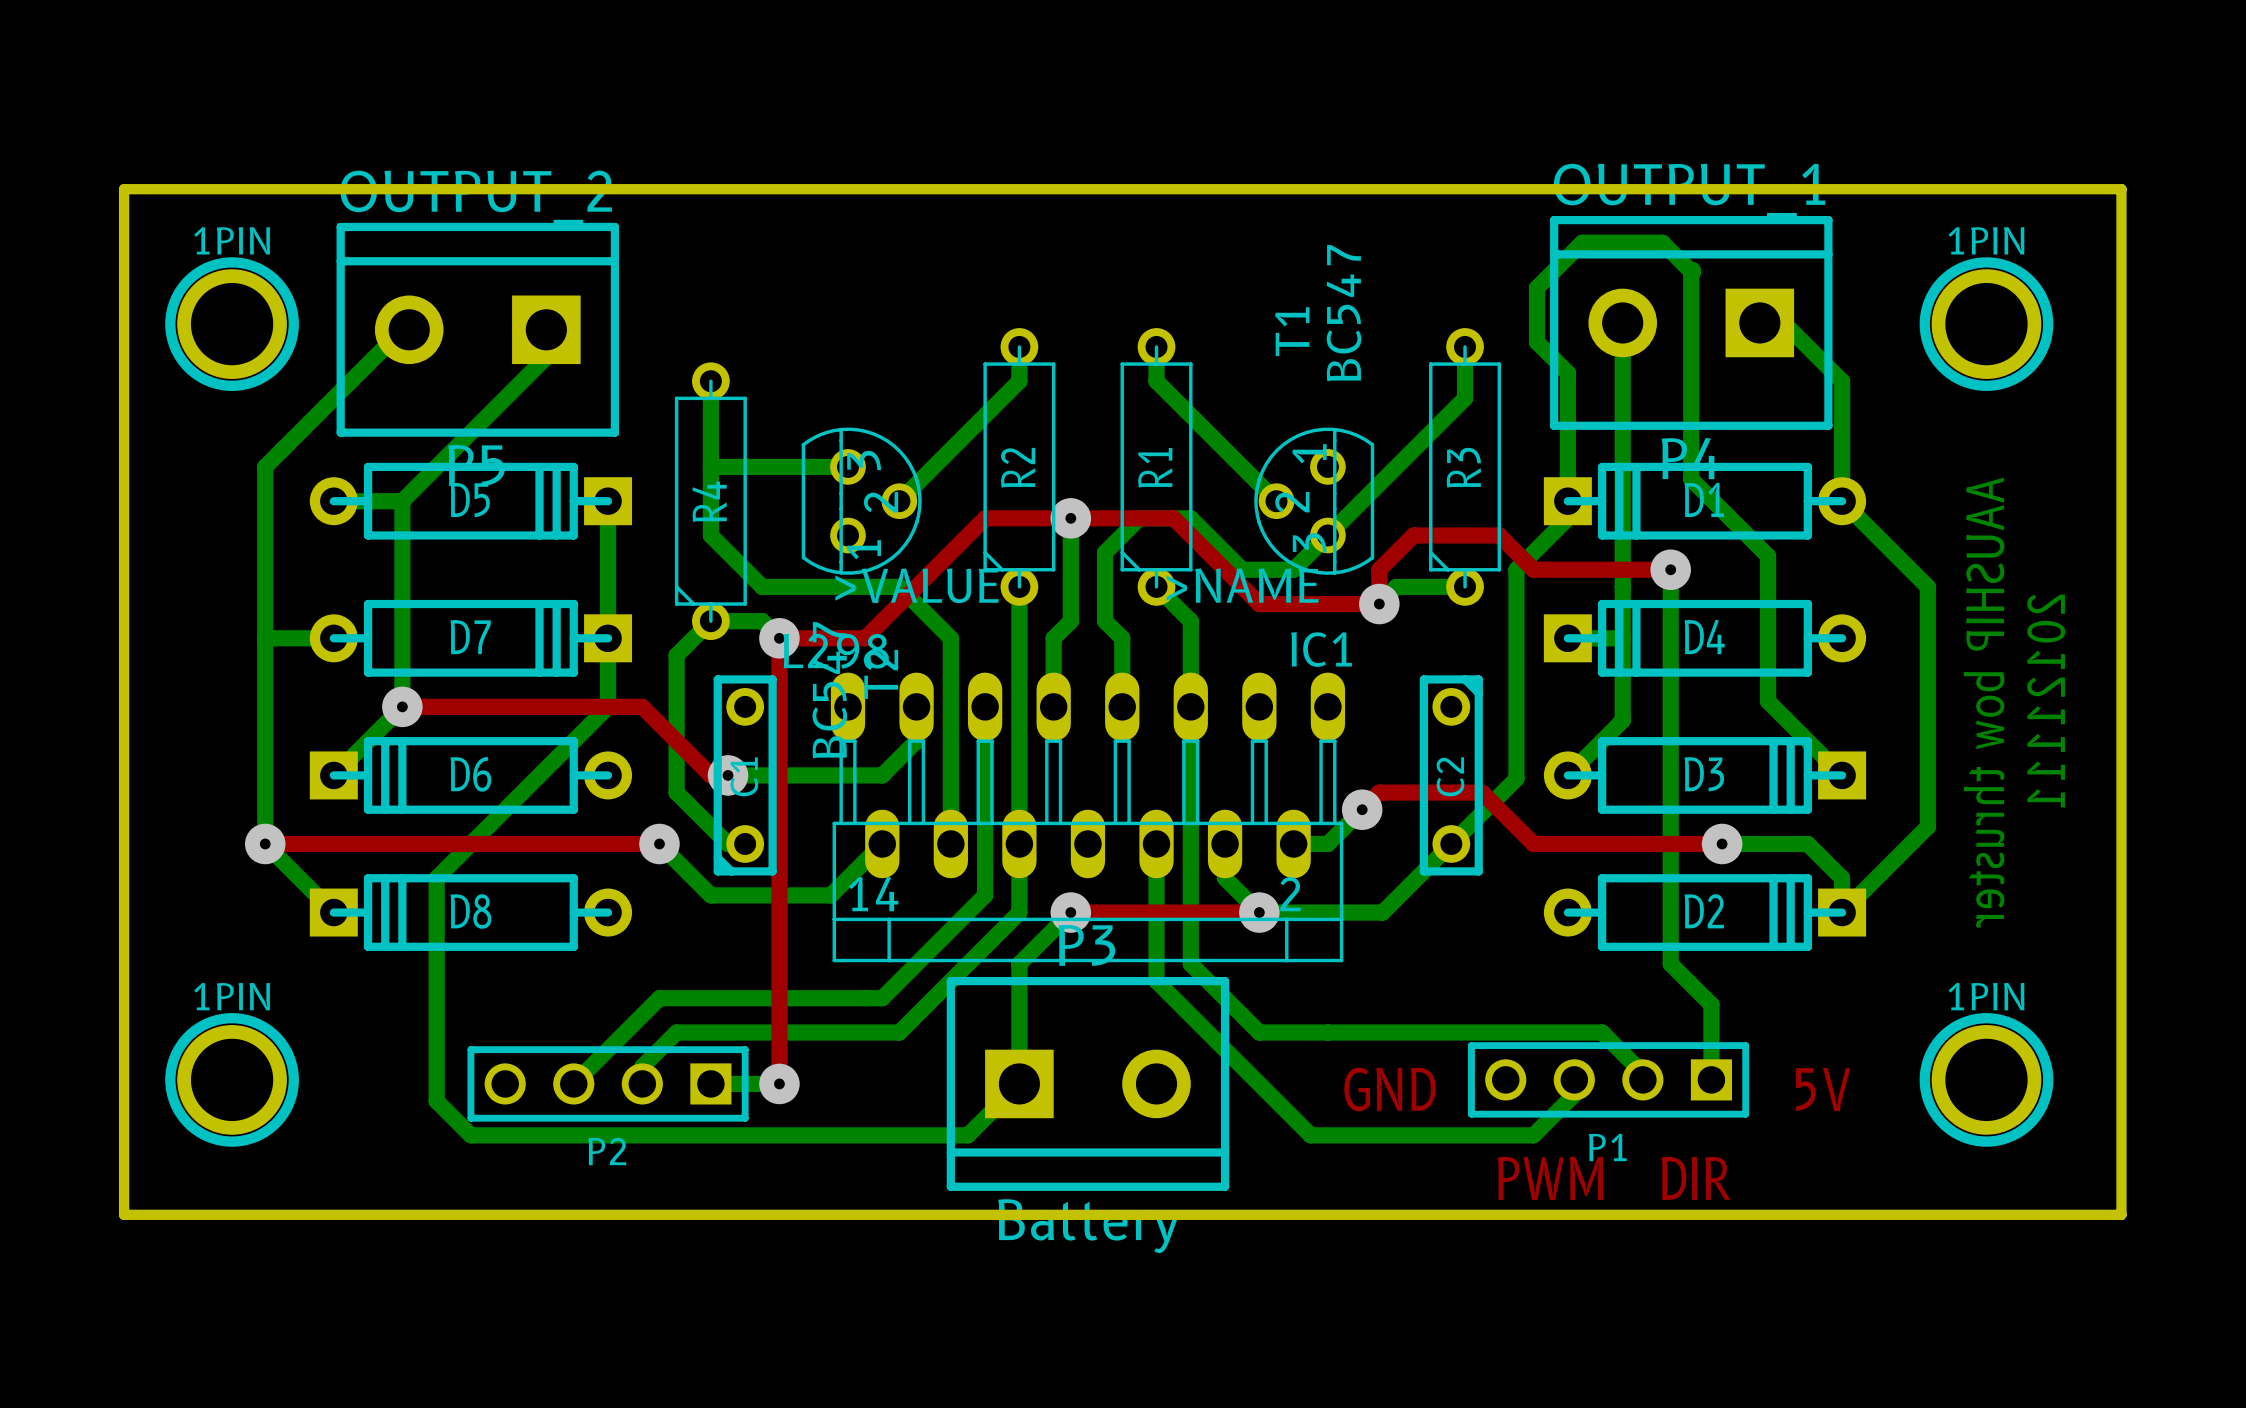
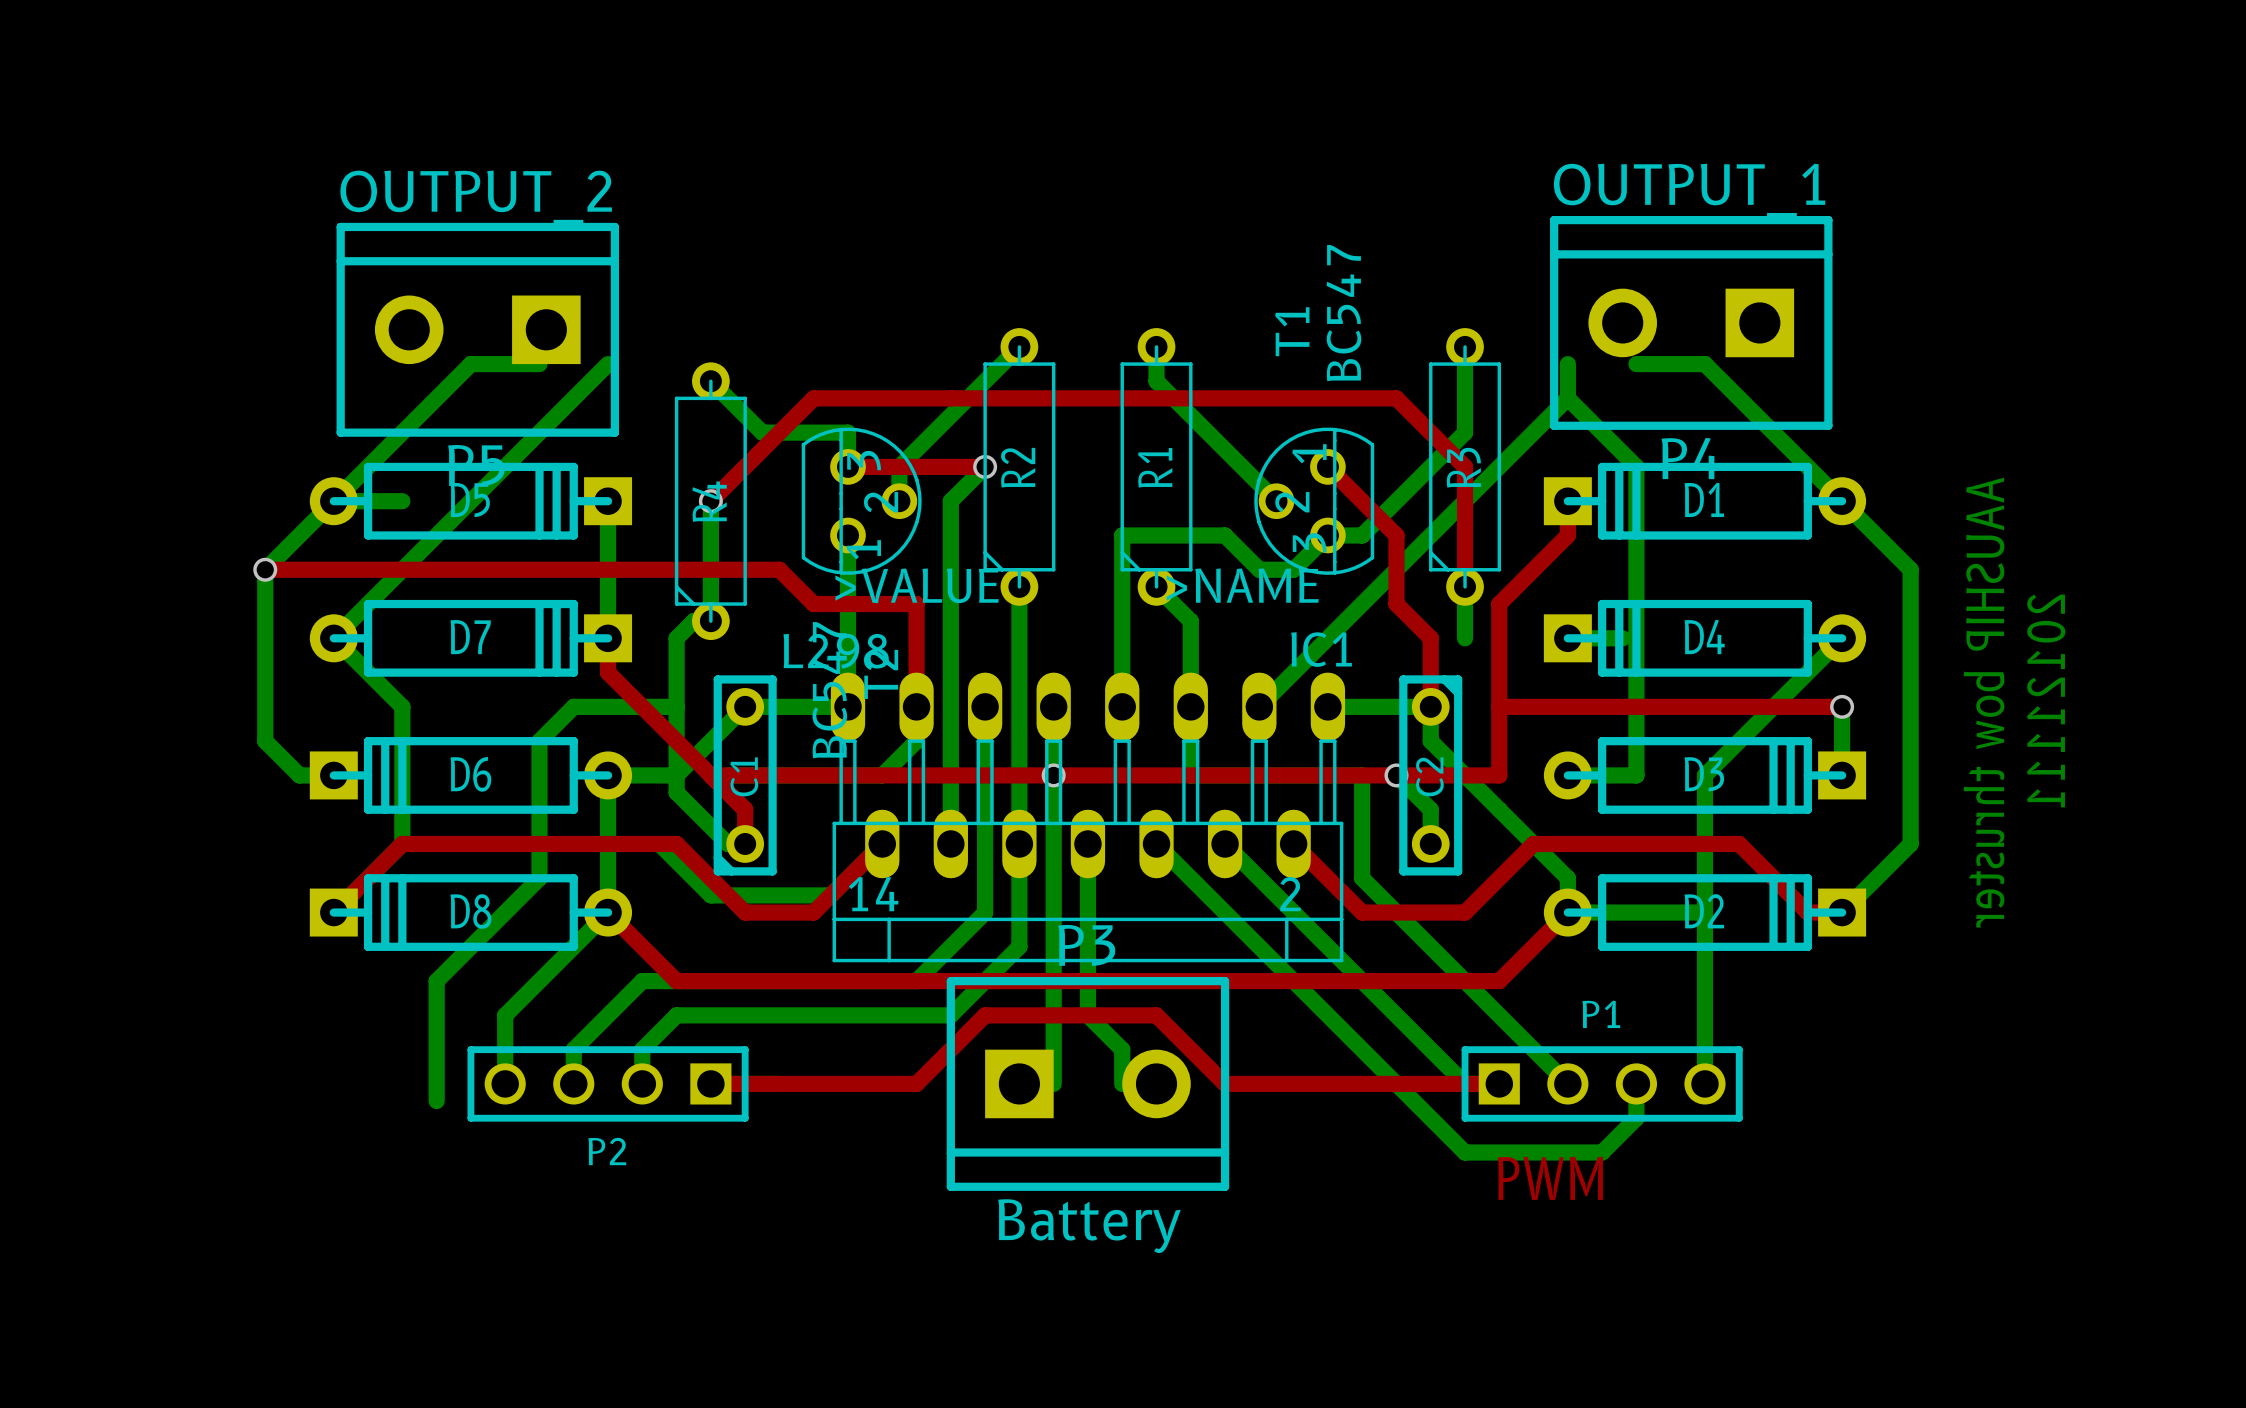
board edge: (124, 189) (124, 1214) (2121, 1214) (2121, 189) (124, 189) -> none
bottom track: (1622, 322) (1622, 720) (1567, 775) -> (1259, 706) (1567, 398) (1636, 466) (1636, 775) (1567, 775)
bottom track: (1759, 322) (1783, 322) (1842, 381) (1842, 501) -> (1636, 364) (1704, 364) (1842, 501)
1PIN: (232, 324) -> none
1PIN: (1986, 324) -> none
bottom track: (409, 329) (402, 329) (265, 466) (265, 569) -> (539, 364) (470, 364) (265, 569)
bottom track: (546, 329) (546, 357) (402, 501) (402, 706) (333, 775) -> none
bottom track: (1019, 346) (1019, 381) (899, 501) -> (1019, 346) (899, 466) (899, 501)
bottom track: none -> (608, 364) (333, 638) (402, 706) (402, 843) (333, 912)
bottom track: none -> (1567, 364) (1567, 372)
bottom track: (1567, 372) (1537, 342) (1537, 287) (1582, 242) (1662, 242) (1692, 272) (1692, 270) (1691, 271) (1691, 479) (1768, 556) (1768, 701) (1842, 775) -> (1842, 706) (1842, 775)
bottom track: (710, 381) (710, 501) -> none
bottom track: (1465, 398) (1327, 535) -> (1465, 398) (1465, 432) (1362, 535) (1327, 535)
bottom track: (1567, 398) (1567, 518) (1516, 569) (1516, 778) (1382, 912) (1259, 912) (1225, 878) (1225, 843) -> (1499, 1083) (1465, 1083) (1225, 843)
bottom track: (710, 466) (848, 466) -> (710, 381) (762, 432) (848, 432) (848, 466)
top track: none -> (848, 466) (985, 466)
via: none -> (985, 466)
top track: none -> (1327, 466) (1396, 535) (1396, 604) (1430, 638) (1430, 706)
top track: none -> (710, 501) (813, 398) (1396, 398) (1465, 466) (1465, 586)
via: none -> (710, 501)
top track: none -> (1567, 501) (1567, 535) (1499, 604) (1499, 775) (728, 775)
bottom track: (1070, 518) (1070, 621) (1053, 638) (1053, 706) -> (1053, 1083) (1053, 706)
via: (1070, 518) -> none
bottom track: (710, 535) (762, 586) (899, 586) (950, 638) -> (985, 466) (950, 501) (950, 638)
bottom track: none -> (848, 535) (848, 706) (745, 706) (676, 775) (608, 775) (608, 912) (505, 1015) (505, 1083)
top track: none -> (265, 569) (779, 569) (813, 604) (916, 604) (916, 706)
via: none -> (265, 569)
bottom track: (1259, 569) (1242, 569) (1190, 518) (1139, 518) (1105, 552) (1105, 621) (1122, 638) -> (1259, 569) (1225, 535) (1122, 535) (1122, 638)
bottom track: (1670, 569) (1670, 963) (1711, 1004) (1711, 1079) -> none
top track: (1670, 569) (1533, 569) (1499, 535) (1413, 535) (1379, 569) (1379, 604) (1259, 604) (1173, 518) (985, 518) (865, 638) (779, 638) (779, 1083) -> none
via: (1670, 569) -> none
bottom track: (1910, 569) (1927, 586) (1927, 826) (1910, 843) -> (1910, 569) (1910, 843)
bottom track: (1465, 586) (1396, 586) (1379, 604) -> (1465, 586) (1465, 638)
via: (1379, 604) -> none
bottom track: (265, 638) (333, 638) -> none
bottom track: (608, 638) (608, 706) (436, 878) (436, 981) -> (676, 706) (573, 706) (539, 741) (539, 878) (436, 981)
bottom track: (779, 638) (762, 621) (710, 621) (676, 655) -> (710, 535) (710, 621) (693, 621) (676, 638) (676, 655)
via: (779, 638) -> none
bottom track: none -> (1842, 638) (1704, 775) (1704, 1083)
top track: (402, 706) (642, 706) -> (608, 638) (608, 672) (642, 706)
via: (402, 706) -> none
bottom track: none -> (1327, 706) (1430, 706) (1430, 741) (1567, 878) (1567, 912) (1704, 912)
top track: none -> (1499, 706) (1842, 706)
via: none -> (1842, 706)
bottom track: (265, 741) (265, 843) (333, 912) -> (265, 741) (299, 775) (333, 775)
top track: none -> (710, 775) (745, 809) (745, 843)
via: (728, 775) -> none
via: none -> (1053, 775)
bottom track: (1190, 775) (1190, 963) (1259, 1032) (1602, 1032) (1642, 1073) (1642, 1079) -> (1190, 775) (1362, 775) (1362, 878) (1567, 1083)
bottom track: none -> (1396, 775) (1430, 809) (1430, 843)
via: none -> (1396, 775)
C2 position: (1451, 775) -> (1430, 775)
bottom track: (1362, 809) (1327, 843) (1293, 843) -> none
top track: (1362, 809) (1379, 792) (1482, 792) (1533, 843) -> (1293, 843) (1362, 912) (1465, 912) (1533, 843)
via: (1362, 809) -> none
top track: (265, 843) (402, 843) -> (333, 912) (402, 843)
via: (265, 843) -> none
top track: none -> (659, 843) (676, 843) (745, 912) (813, 912) (882, 843)
via: (659, 843) -> none
bottom track: none -> (1087, 843) (1087, 1015) (1122, 1049) (1122, 1083)
bottom track: (1156, 843) (1156, 981) (1310, 1135) (1533, 1135) (1574, 1094) (1574, 1079) -> (1156, 843) (1465, 1152) (1602, 1152) (1636, 1118) (1636, 1083)
bottom track: (1722, 843) (1807, 843) (1842, 878) (1842, 912) -> none
top track: none -> (1722, 843) (1739, 843) (1807, 912) (1842, 912)
via: (1722, 843) -> none
bottom track: (985, 895) (882, 998) (659, 998) (573, 1083) -> (985, 895) (985, 912) (916, 981) (642, 981) (573, 1049) (573, 1083)
top track: none -> (608, 912) (676, 981) (1499, 981) (1567, 912)
bottom track: (1019, 912) (899, 1032) (676, 1032) (642, 1066) -> (1019, 912) (1019, 946) (950, 1015) (676, 1015) (642, 1049) (642, 1066)
bottom track: (1070, 912) (1019, 963) (1019, 1083) (967, 1135) (470, 1135) (436, 1101) -> none
top track: (1070, 912) (1259, 912) -> none
via: (1070, 912) -> none
via: (1259, 912) -> none
1PIN: (232, 1079) -> none
P1 rotation: 0° (1608, 1079) -> 180° (1602, 1083)
1PIN: (1986, 1079) -> none
top track: none -> (710, 1083) (916, 1083) (985, 1015) (1156, 1015) (1225, 1083) (1499, 1083)
via: (779, 1083) -> none
text: GND (1389, 1089) -> none
text: 5V (1823, 1089) -> none
text: DIR (1695, 1178) -> none

